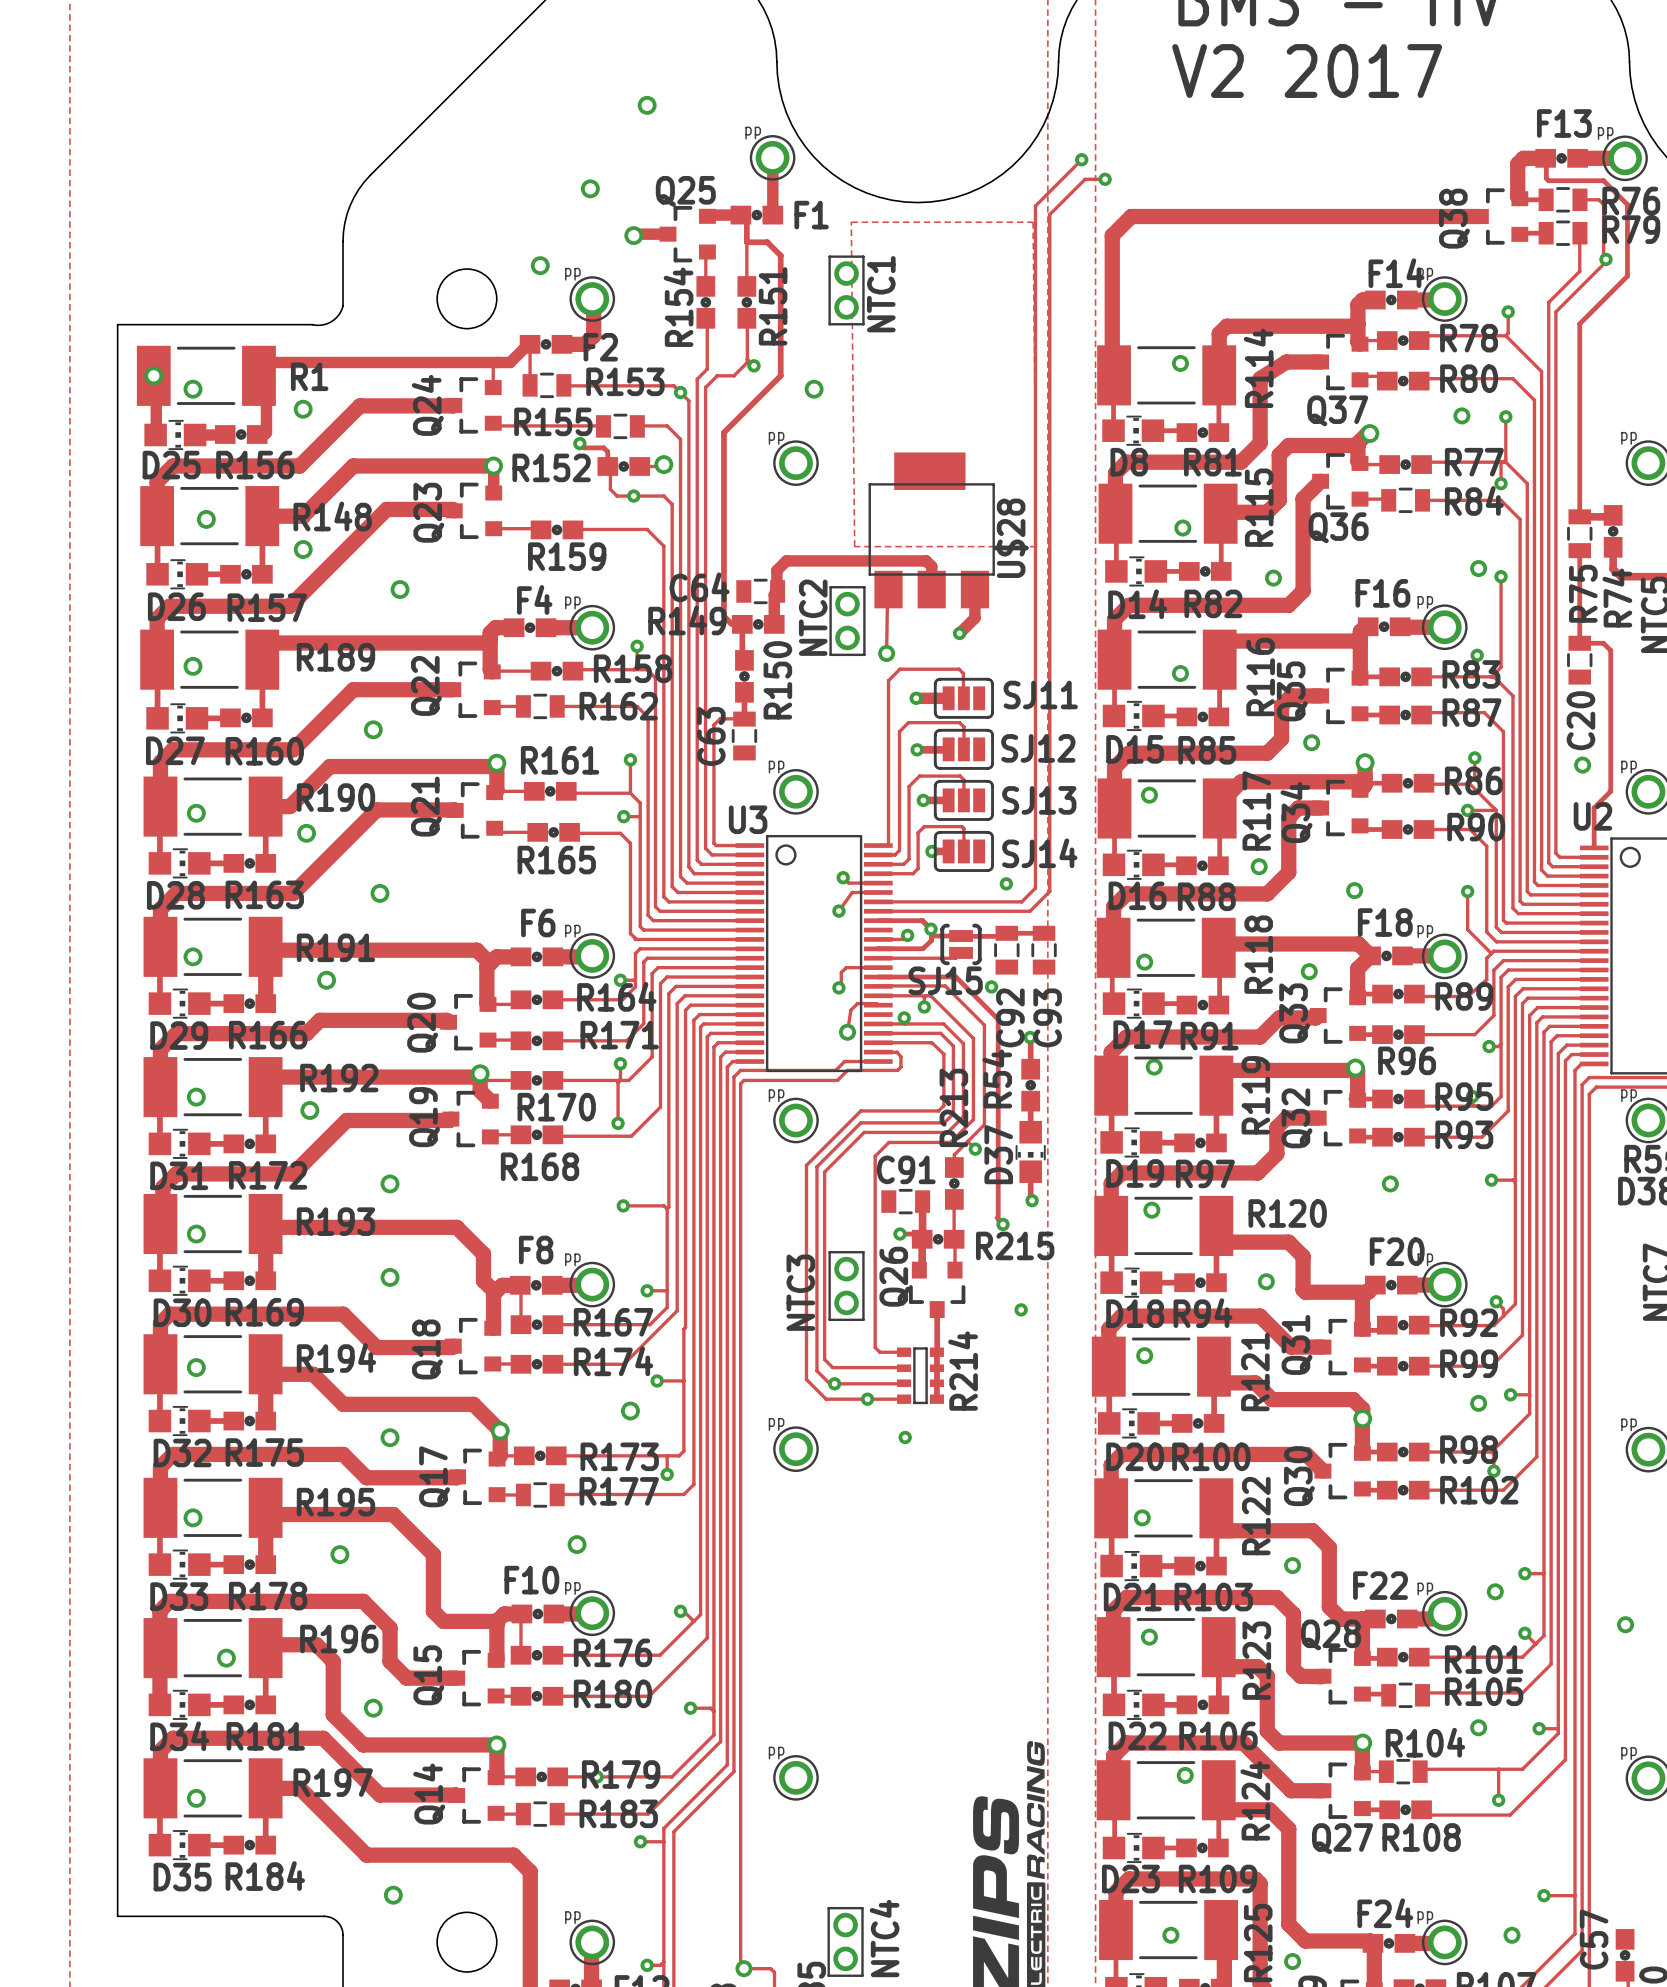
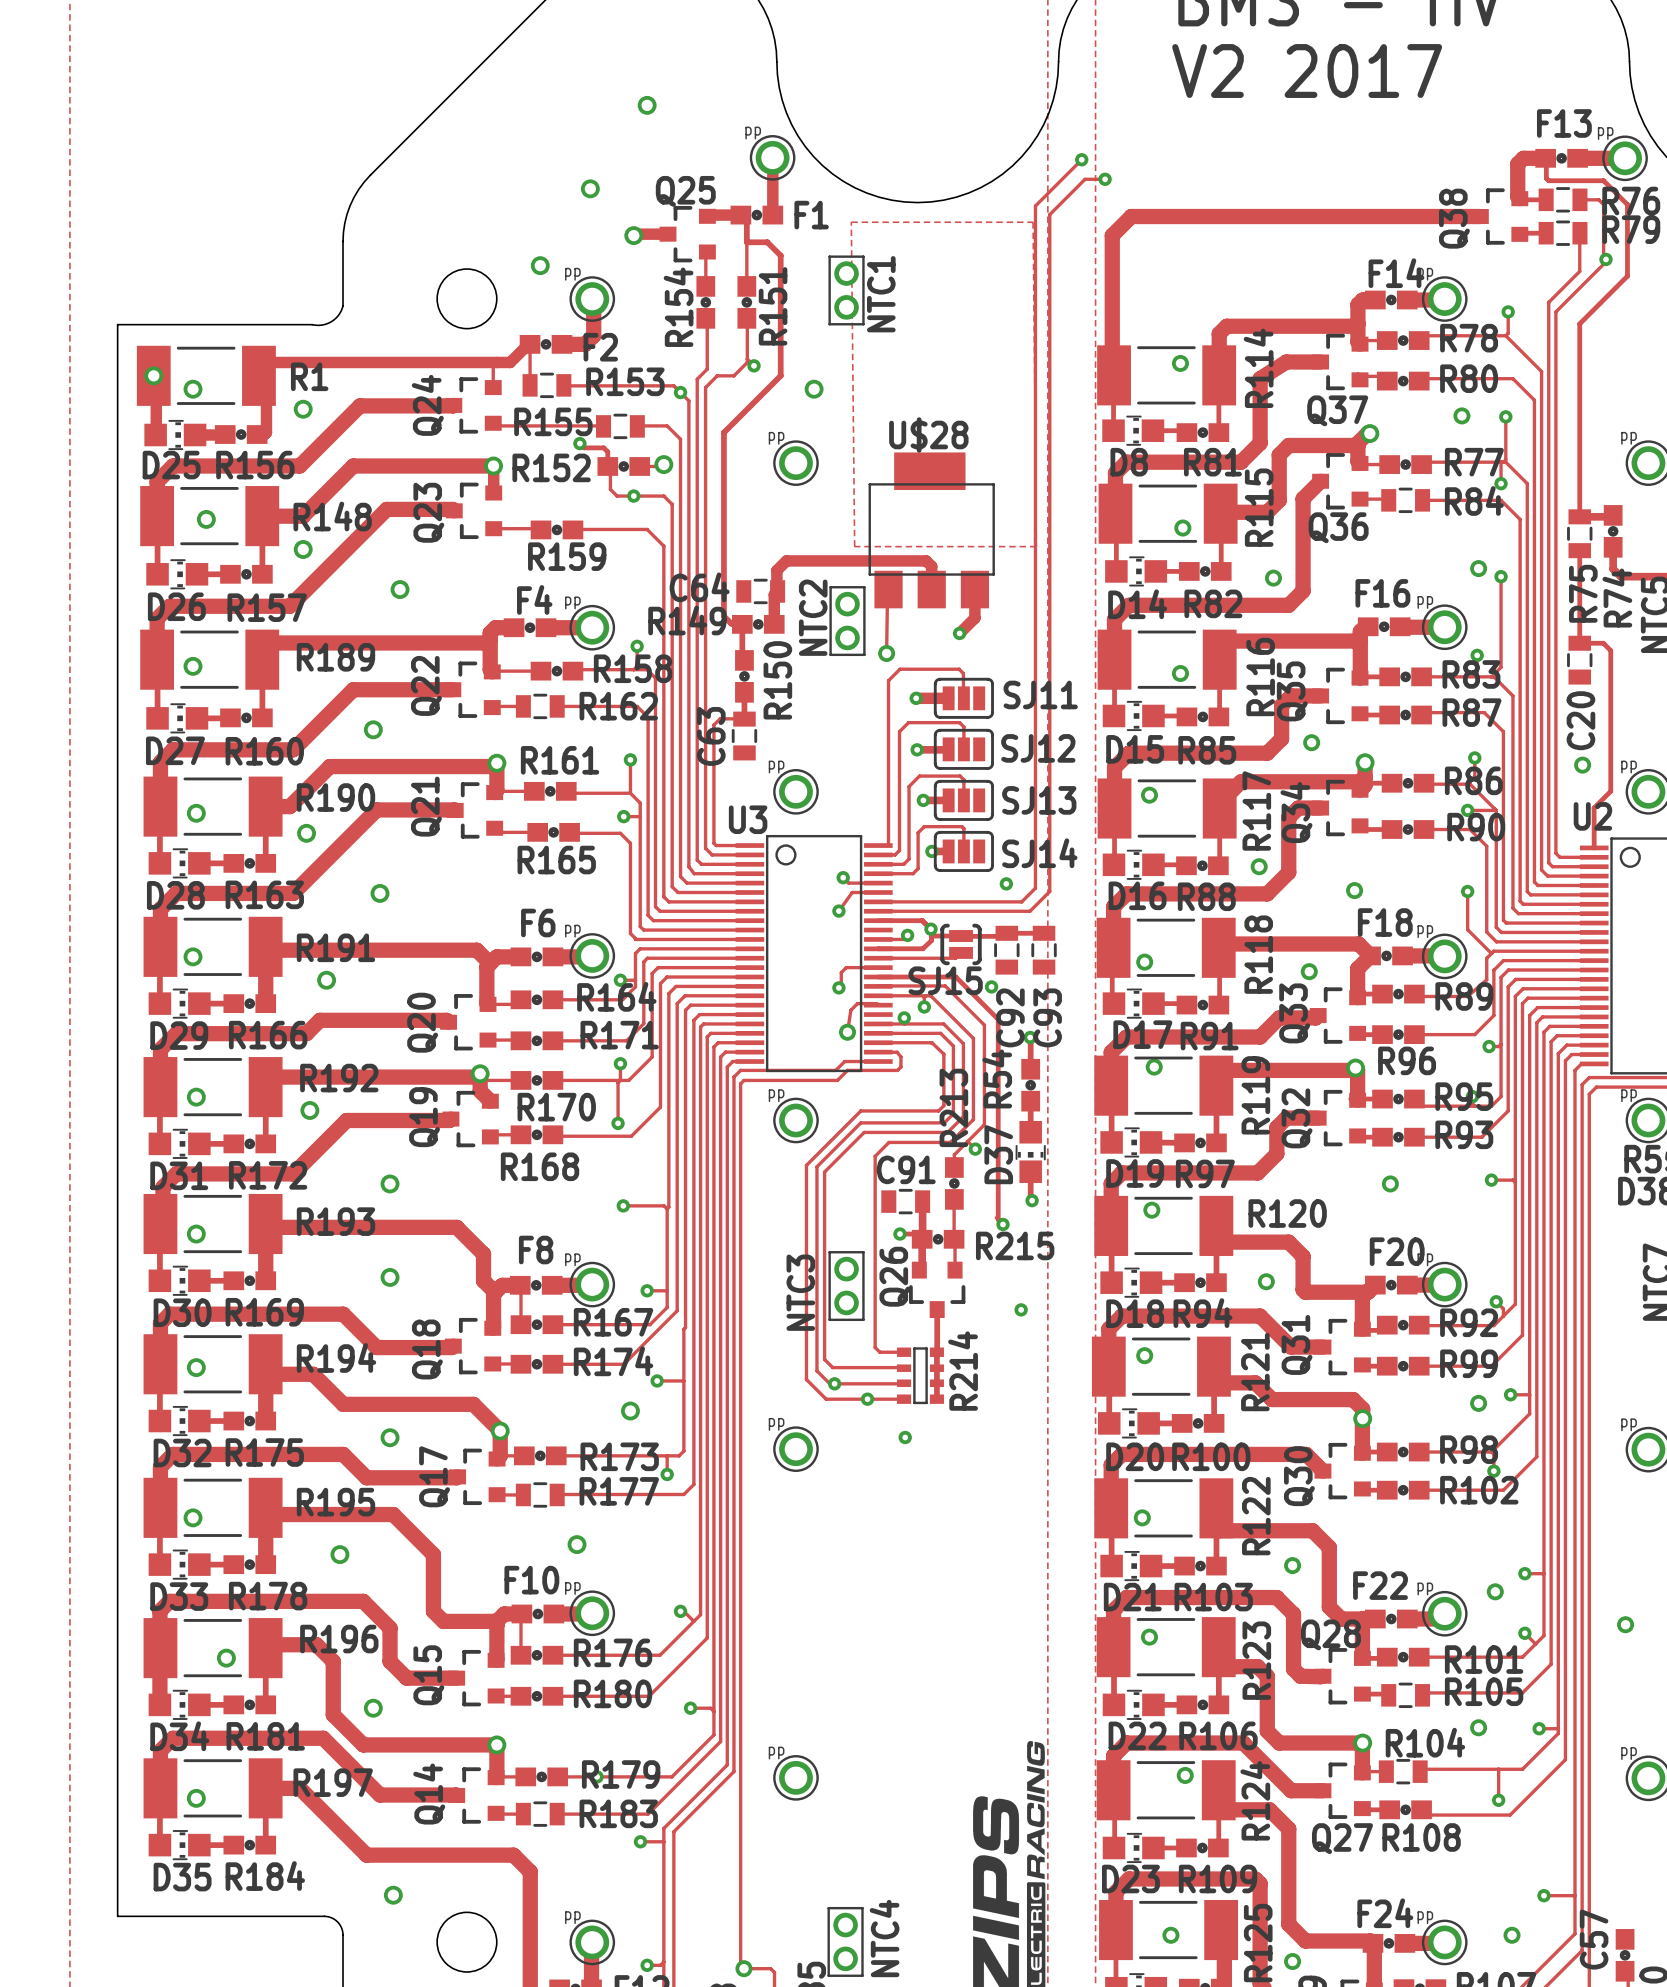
U$28 name rotation: 0° (1011, 538) -> 90° clockwise (928, 434)
U$28 name position: U$28 (1011, 538) -> U$28 (928, 434)

